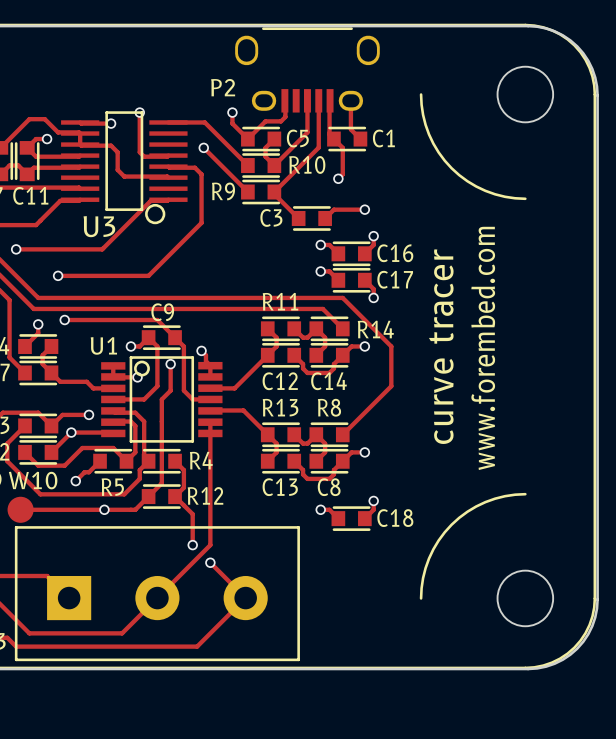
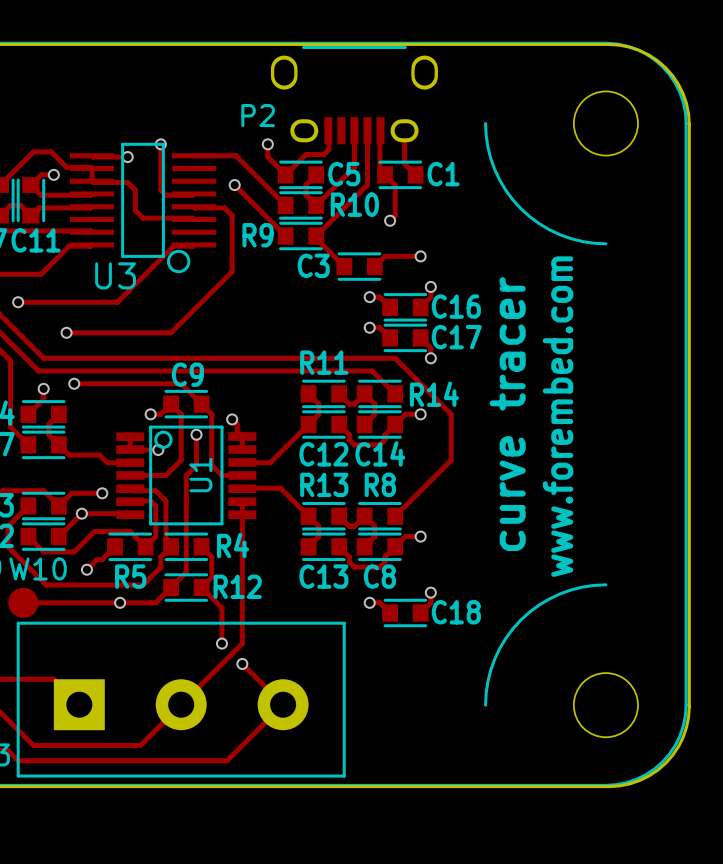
U1 name rotation: 0° (103, 345) -> 90° counterclockwise (200, 474)
U1 name position: U1 (103, 345) -> U1 (200, 474)

